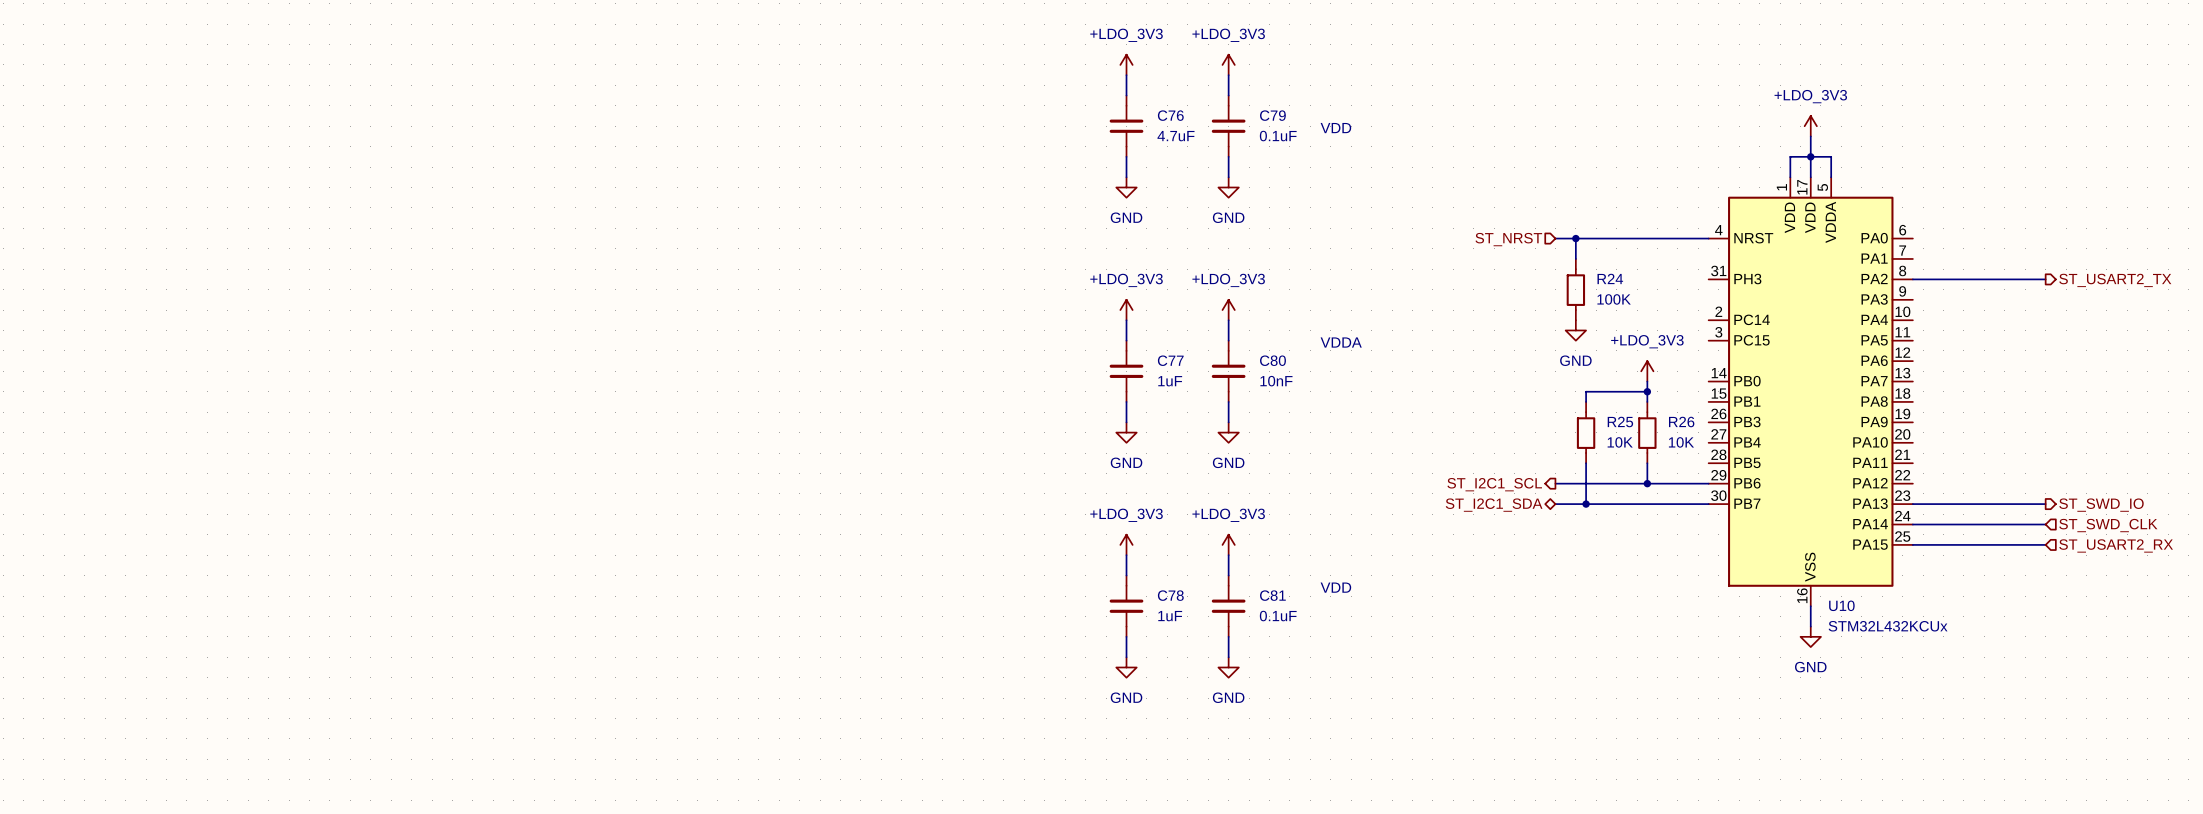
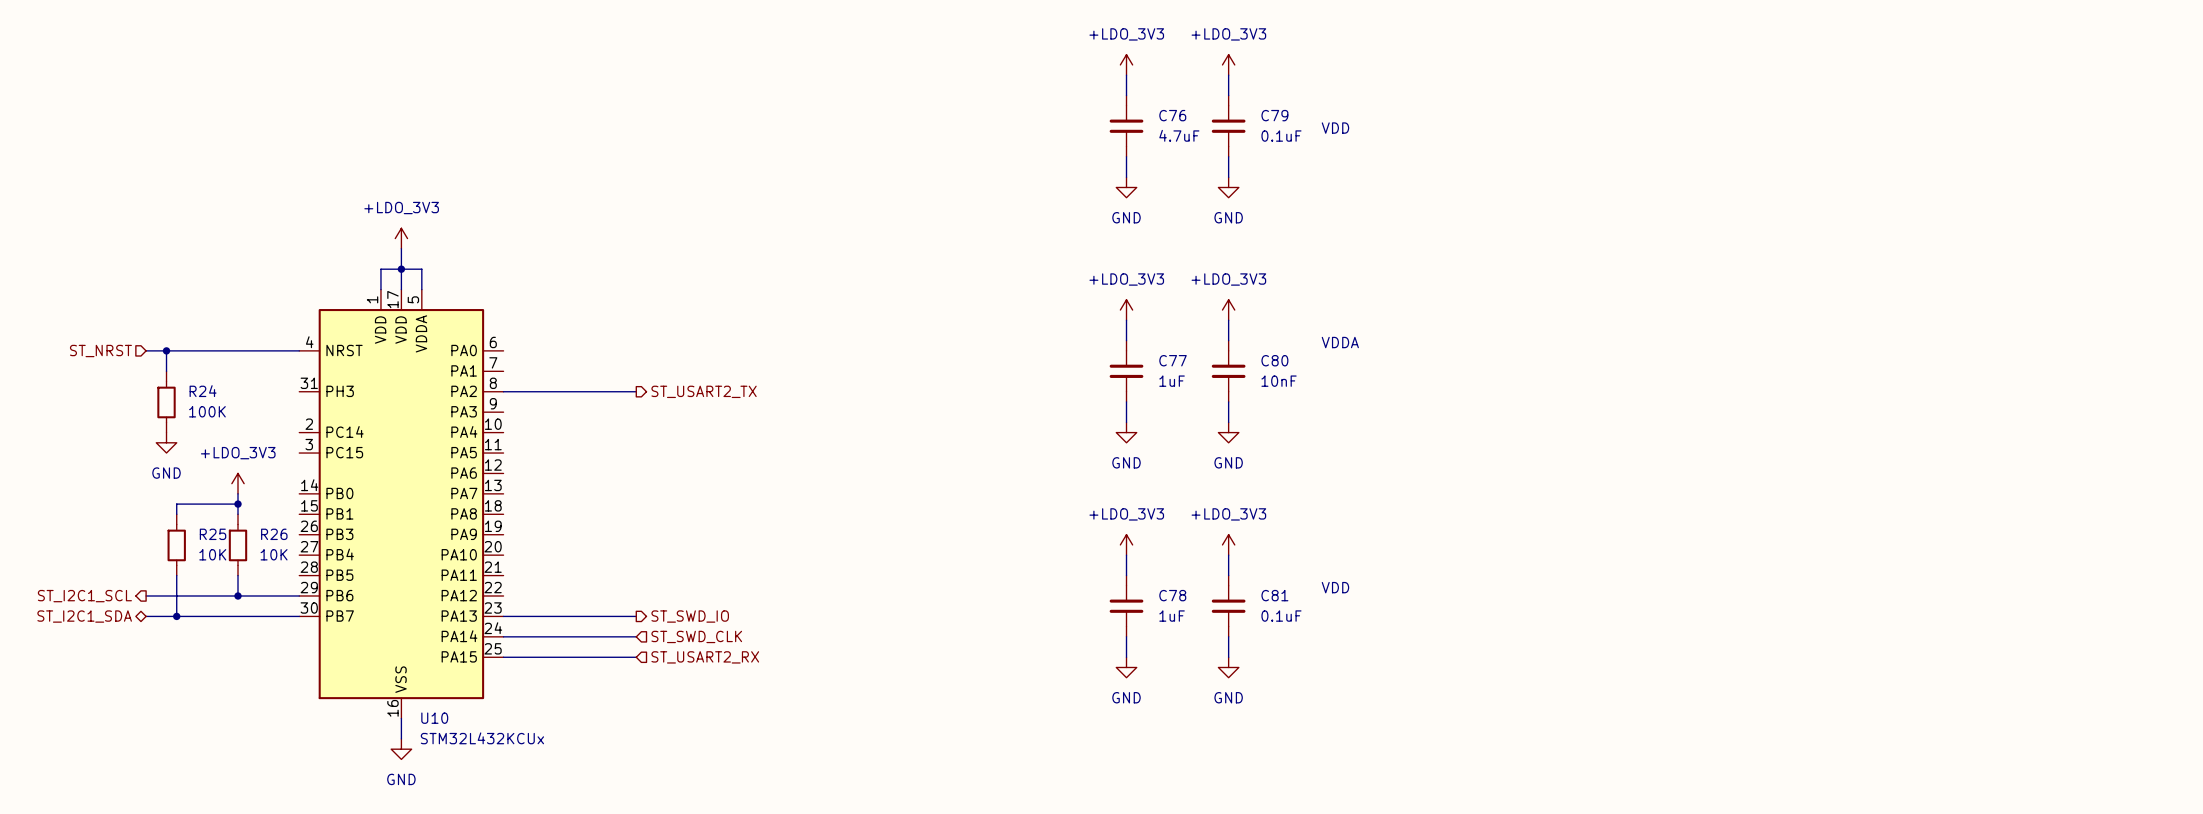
power symbol: +LDO_3V3 (1810, 126) -> none
wire: (1810, 136) (1810, 177) -> none
junction: (1810, 156) -> none
wire: (1790, 177) (1790, 156) (1831, 156) (1831, 177) -> none
power symbol: none -> +LDO_3V3 (401, 238)
wire: (1555, 238) (1708, 238) -> none
wire: (1575, 238) (1575, 258) -> none
junction: (1575, 238) -> none
hierarchical label: ST_NRST (1508, 239) -> none
wire: none -> (401, 248) (401, 289)
junction: none -> (401, 269)
wire: (1912, 279) (2045, 279) -> none
hierarchical label: ST_USART2_TX (2115, 280) -> none
wire: none -> (380, 289) (380, 269) (421, 269) (421, 289)
R24 position: (1575, 289) -> (166, 401)
power symbol: GND (1575, 330) -> none
wire: none -> (146, 350) (299, 350)
wire: none -> (166, 350) (166, 371)
junction: none -> (166, 350)
hierarchical label: none -> ST_NRST (100, 351)
power symbol: +LDO_3V3 (1647, 371) -> none
wire: (1647, 381) (1647, 401) -> none
wire: none -> (503, 391) (636, 391)
wire: (1647, 391) (1586, 391) (1586, 401) -> none
junction: (1647, 391) -> none
U10 position: (1810, 391) -> (401, 504)
hierarchical label: none -> ST_USART2_TX (704, 391)
R25 position: (1586, 432) -> (176, 544)
R26 position: (1647, 432) -> (238, 544)
power symbol: none -> GND (166, 442)
wire: (1586, 463) (1586, 504) -> none
wire: (1647, 463) (1647, 483) -> none
power symbol: none -> +LDO_3V3 (238, 483)
wire: (1555, 483) (1708, 483) -> none
junction: (1647, 483) -> none
hierarchical label: ST_I2C1_SCL (1494, 484) -> none
wire: none -> (238, 493) (238, 514)
wire: none -> (238, 504) (176, 504) (176, 514)
junction: none -> (238, 504)
wire: (1555, 504) (1708, 504) -> none
junction: (1586, 504) -> none
wire: (1912, 504) (2045, 504) -> none
hierarchical label: ST_I2C1_SDA (1494, 505) -> none
hierarchical label: ST_SWD_IO (2101, 505) -> none
wire: (1912, 524) (2045, 524) -> none
hierarchical label: ST_SWD_CLK (2108, 525) -> none
wire: (1912, 544) (2045, 544) -> none
hierarchical label: ST_USART2_RX (2116, 545) -> none
wire: none -> (176, 575) (176, 616)
wire: none -> (238, 575) (238, 596)
wire: none -> (146, 596) (299, 596)
junction: none -> (238, 596)
hierarchical label: none -> ST_I2C1_SCL (84, 596)
wire: (1810, 606) (1810, 626) -> none
wire: none -> (146, 616) (299, 616)
junction: none -> (176, 616)
wire: none -> (503, 616) (636, 616)
hierarchical label: none -> ST_I2C1_SDA (84, 616)
hierarchical label: none -> ST_SWD_IO (690, 616)
wire: none -> (503, 636) (636, 636)
power symbol: GND (1810, 636) -> none
hierarchical label: none -> ST_SWD_CLK (696, 636)
wire: none -> (503, 657) (636, 657)
hierarchical label: none -> ST_USART2_RX (705, 657)
wire: none -> (401, 718) (401, 738)
power symbol: none -> GND (401, 749)

